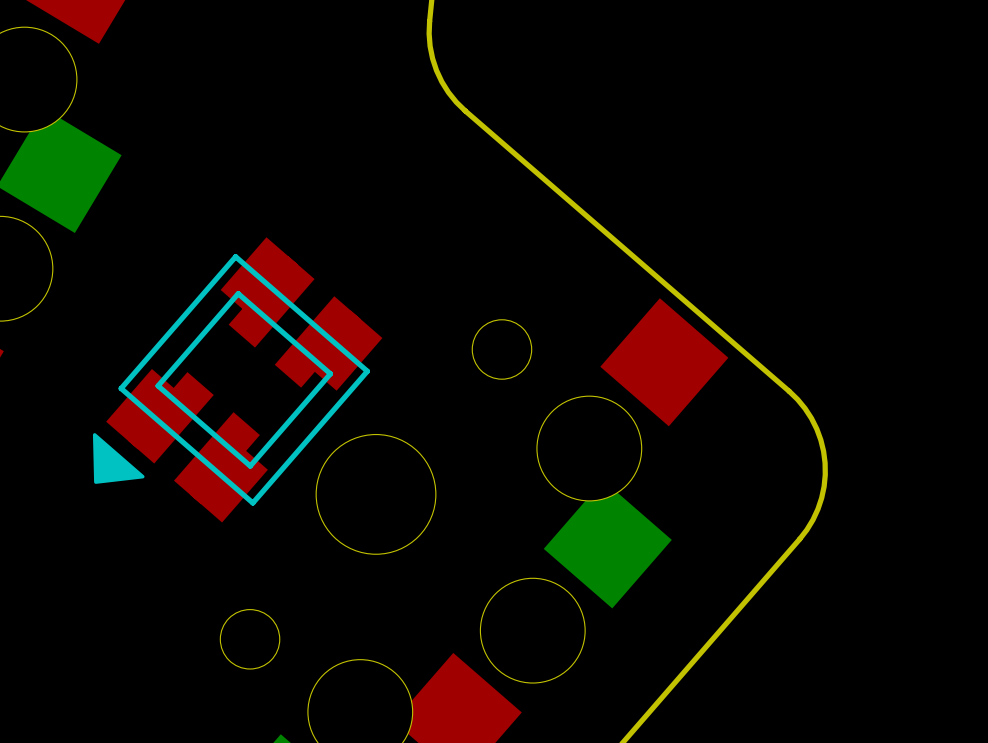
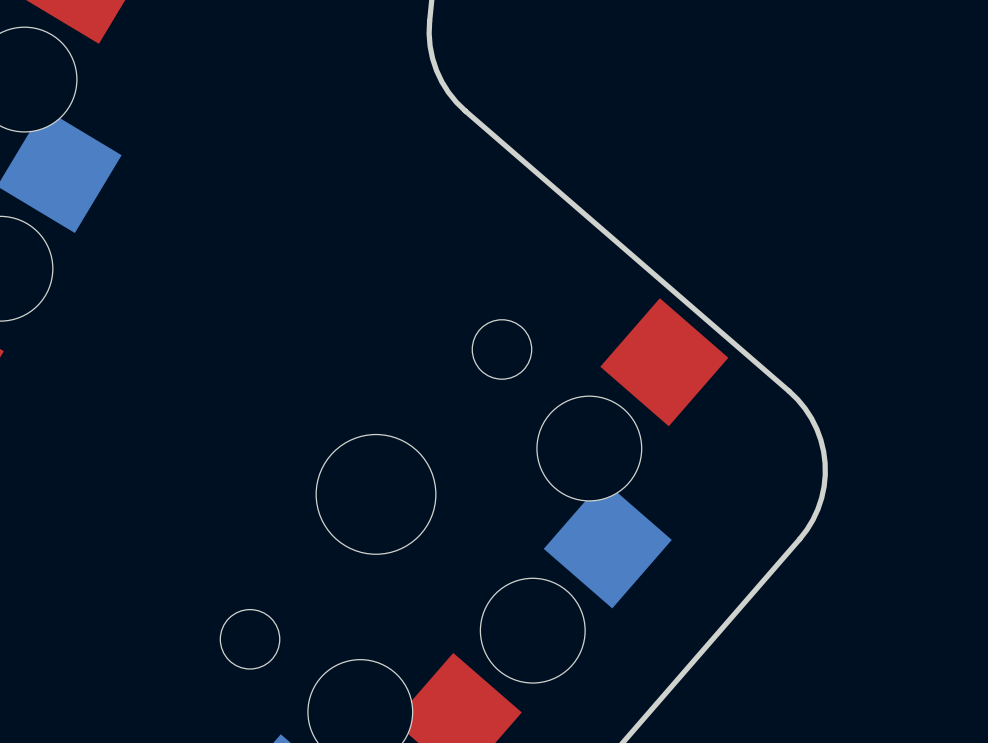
part: (237, 379) -> none

